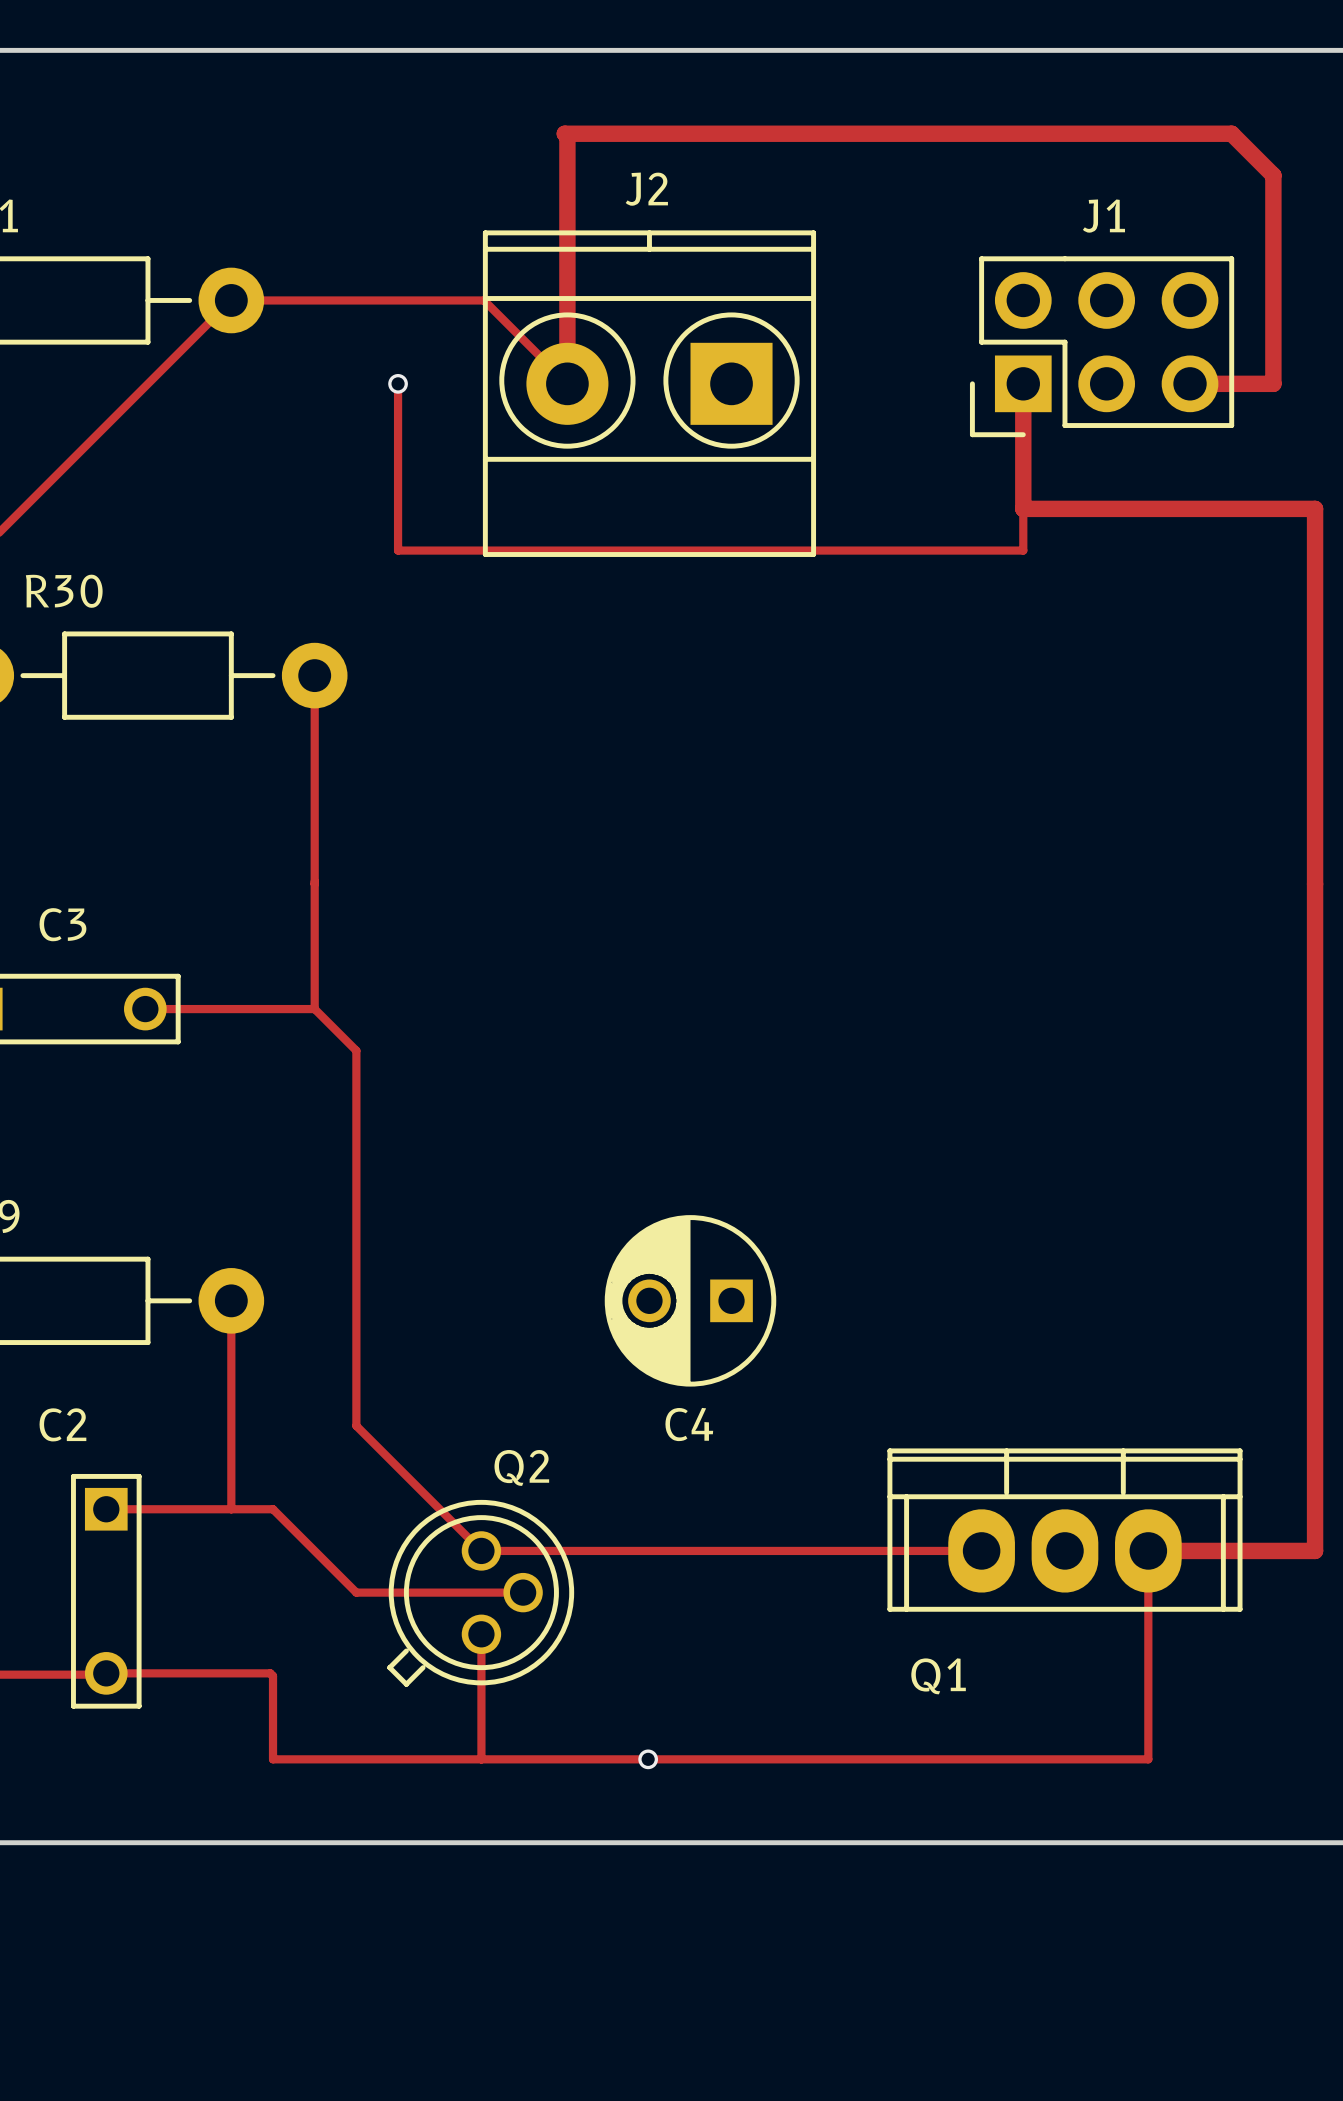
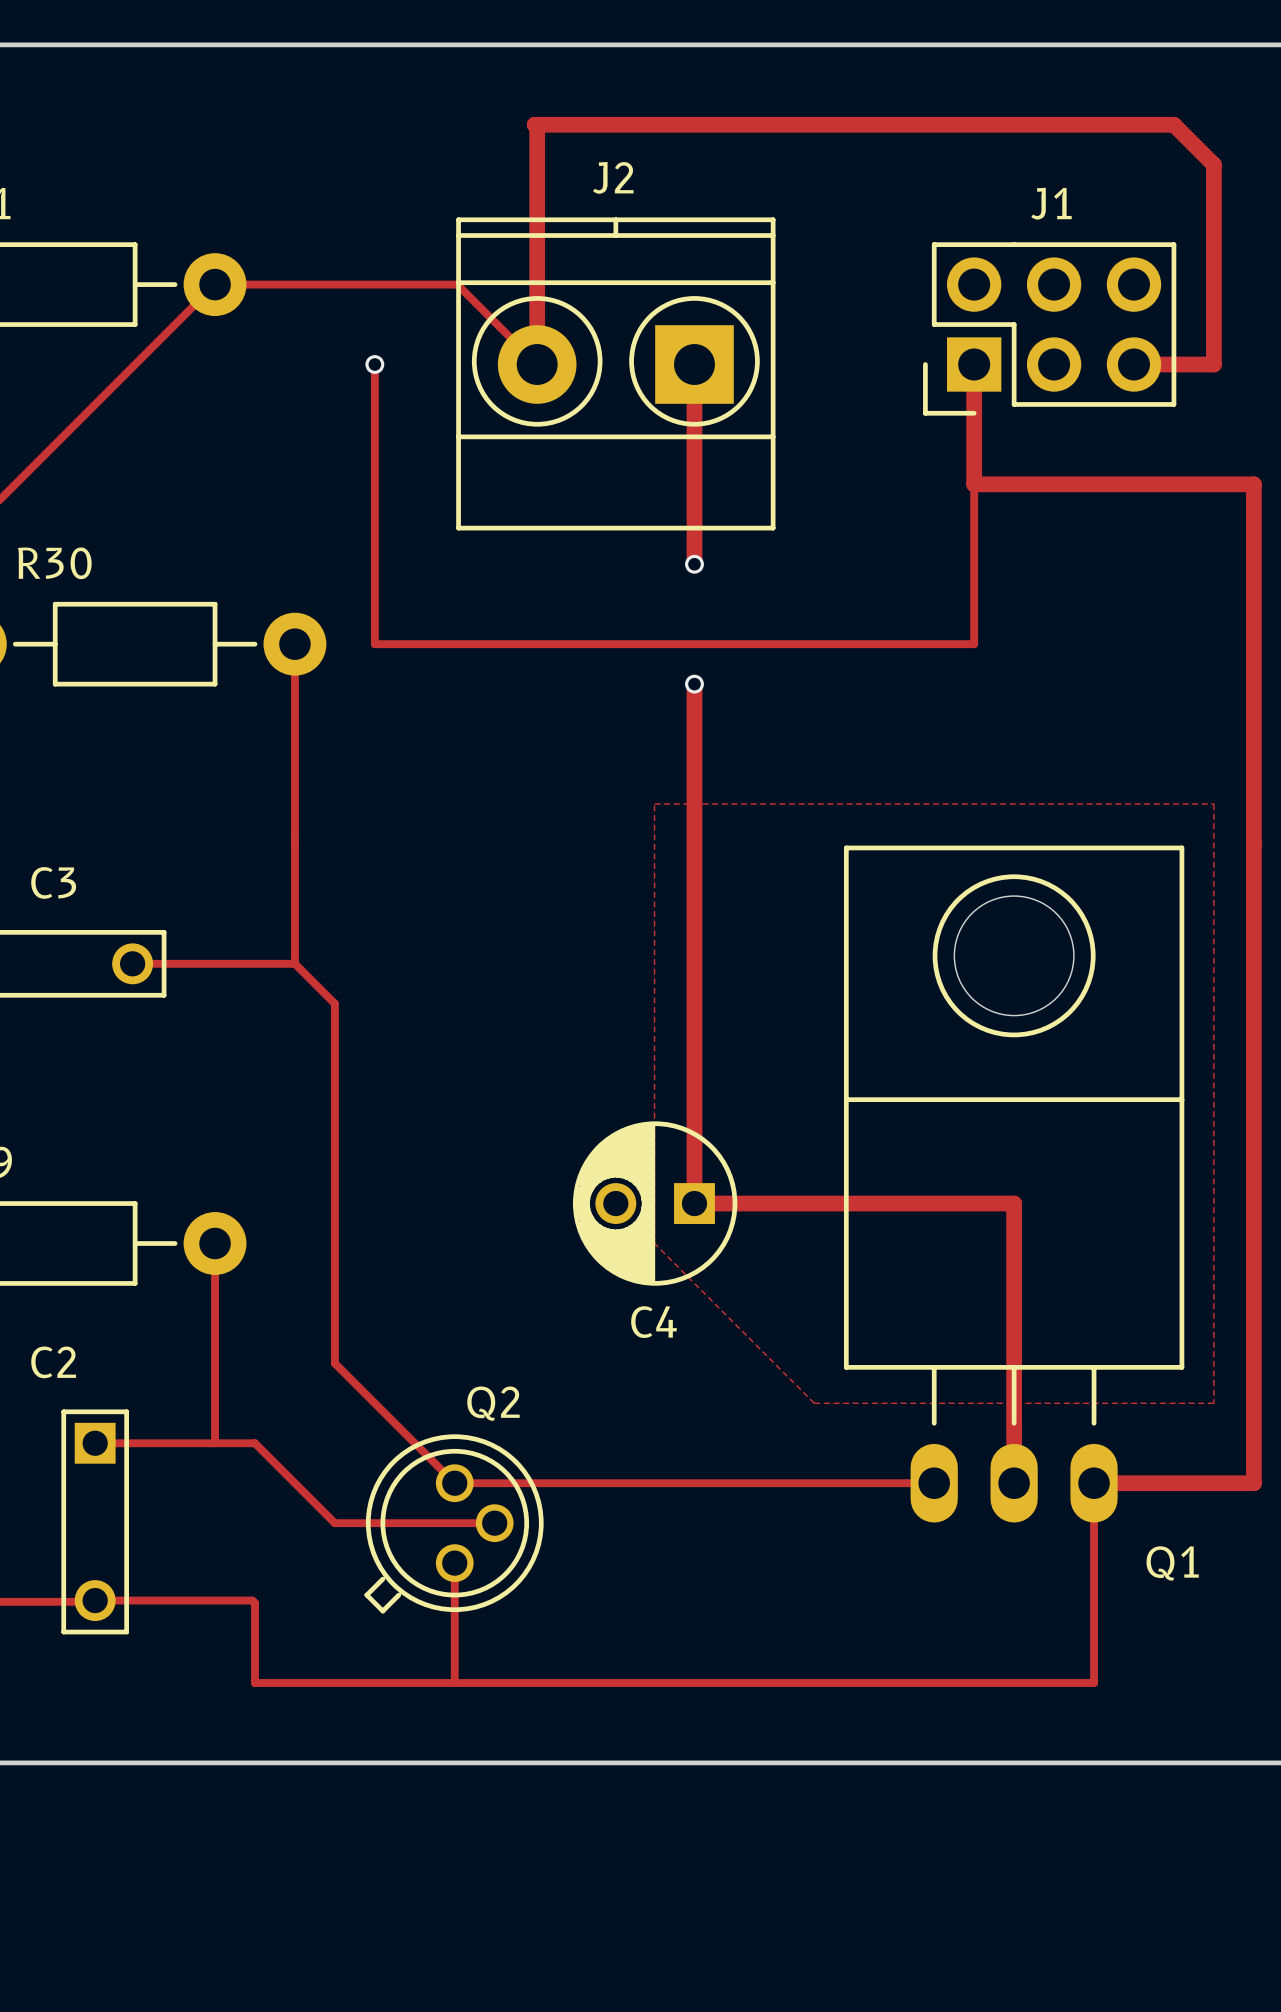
track: none -> (694, 364) (694, 564)
track: (398, 550) (1023, 550) -> (374, 524) (374, 644) (974, 644) (974, 524)
via: none -> (694, 564)
track: none -> (694, 684) (694, 1203) (1014, 1203) (1014, 1483)
via: none -> (694, 684)
zone outline: none -> (654, 803) (654, 1243) (814, 1403) (1213, 1403) (1213, 803) (654, 803)
C4 position: (690, 1300) -> (655, 1203)
Q1 footprint: [887, 1448, 1243, 1612] -> [843, 845, 1185, 1523]
Q1 name position: Q1 (938, 1676) -> Q1 (1172, 1563)
via: (648, 1759) -> none

